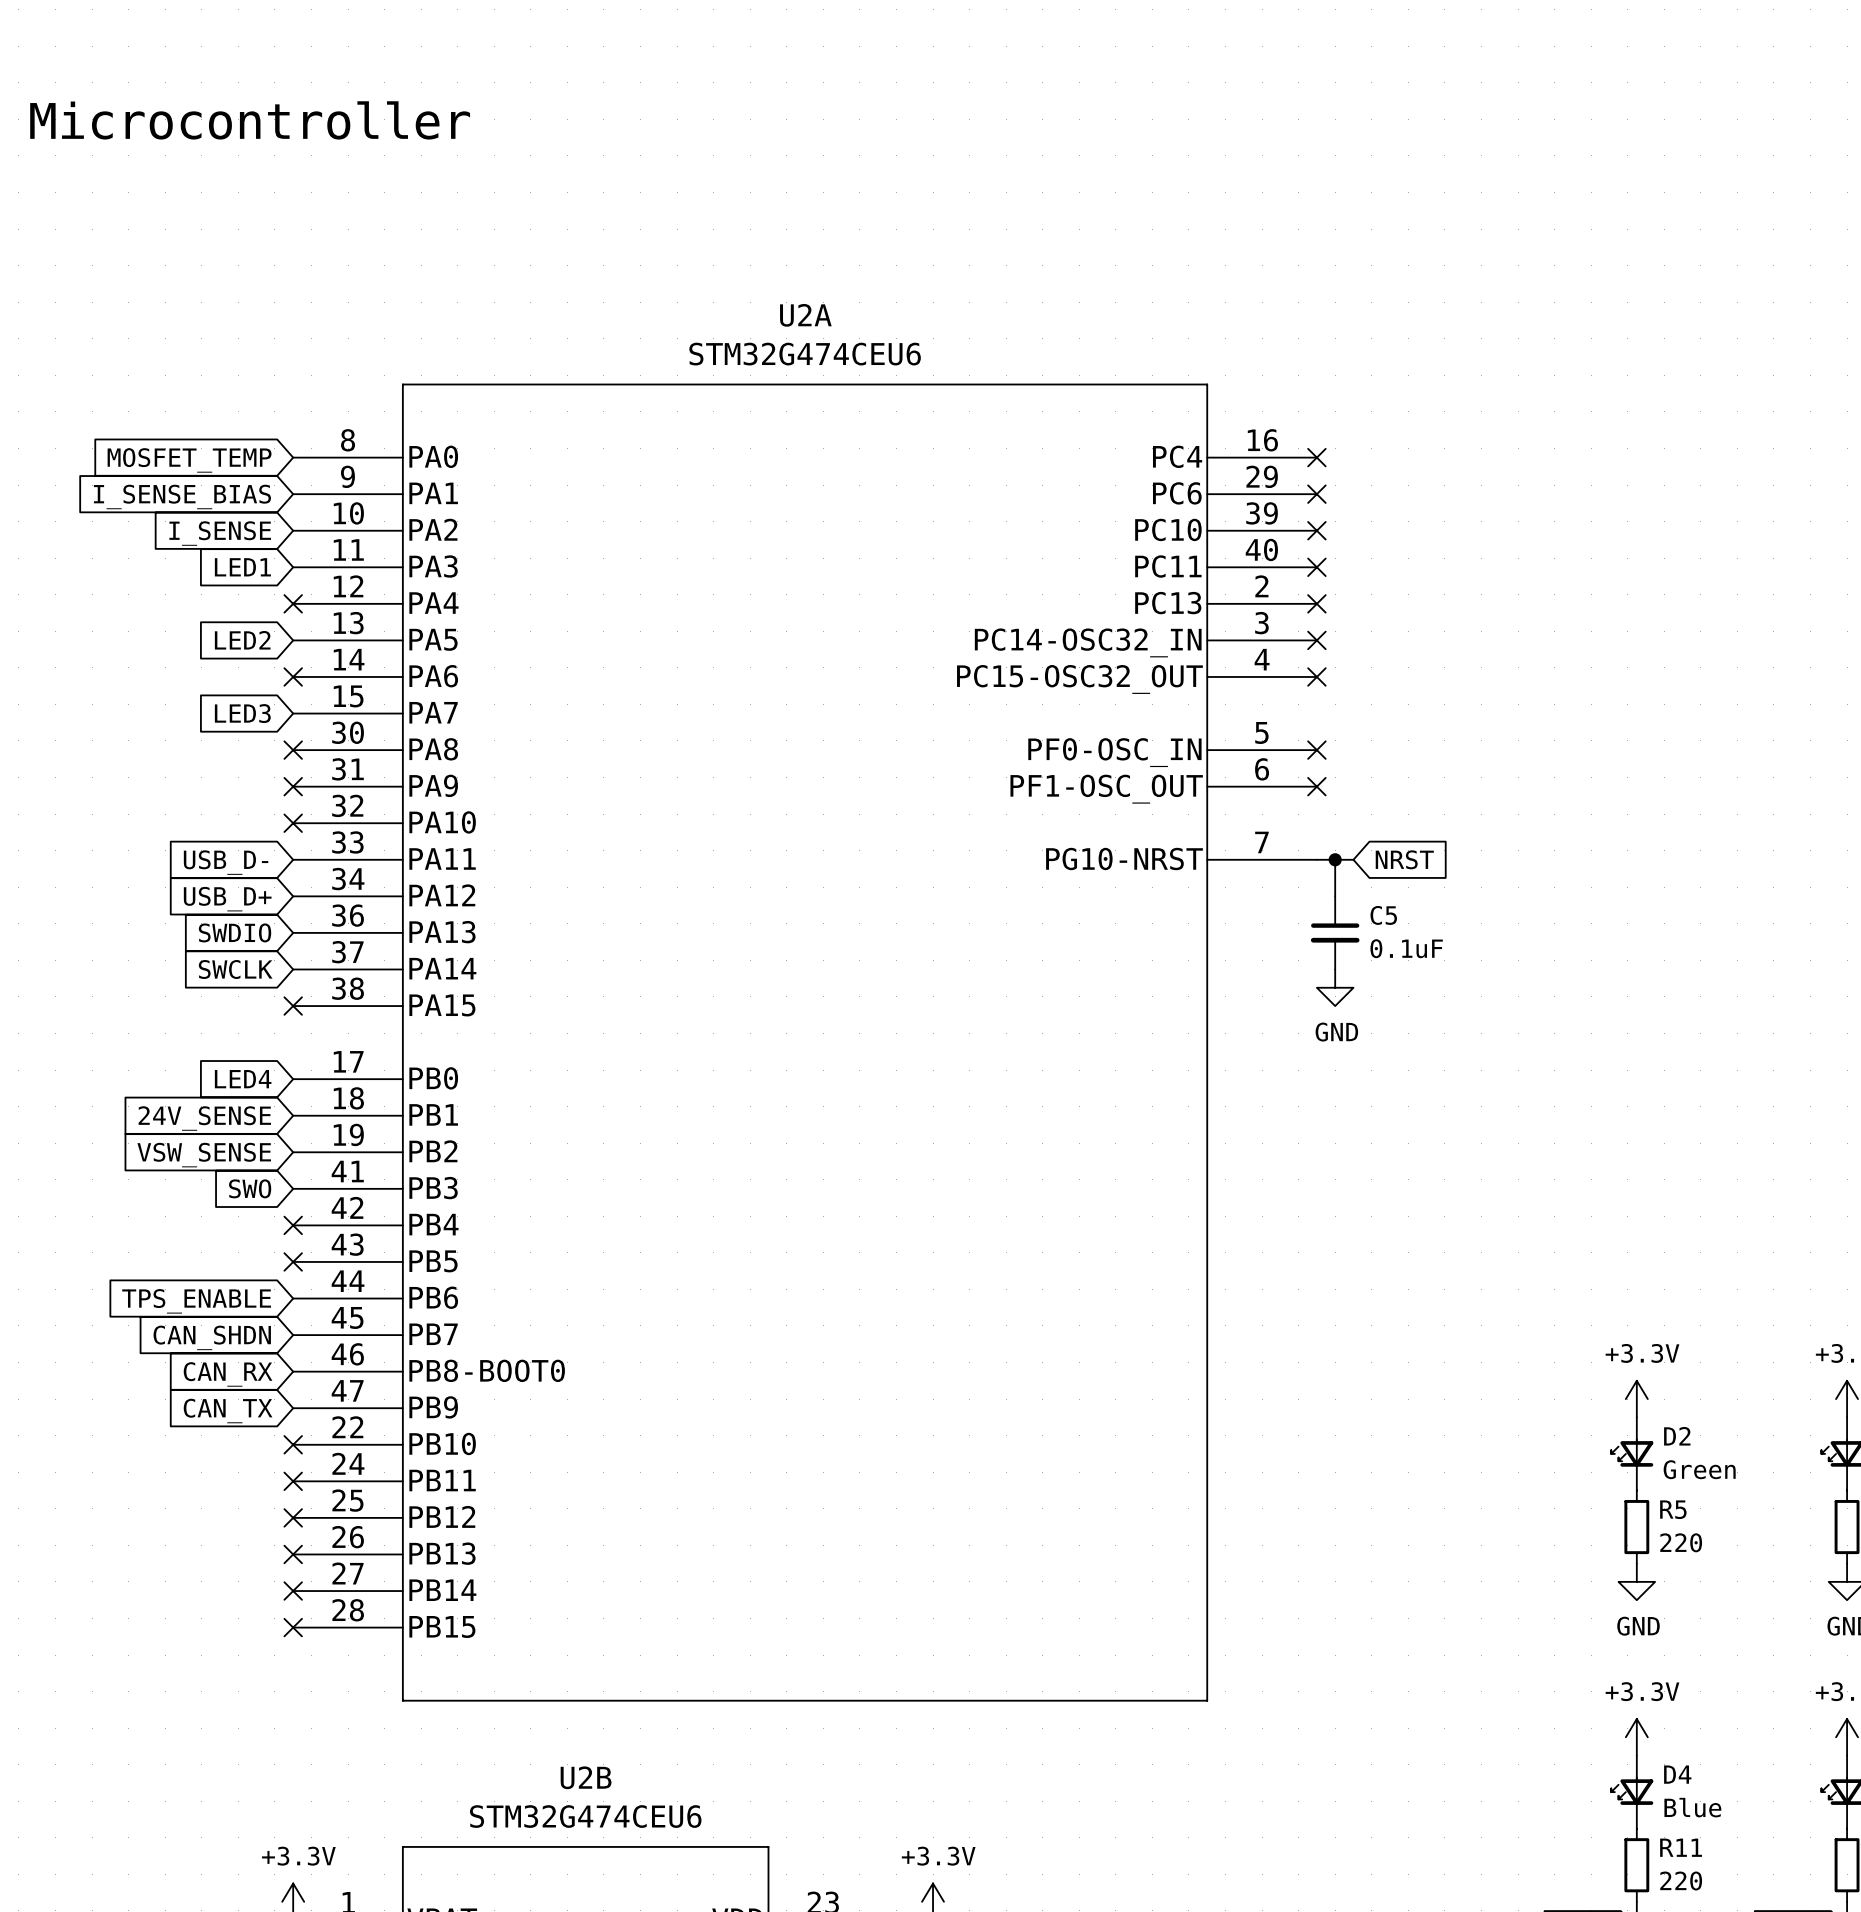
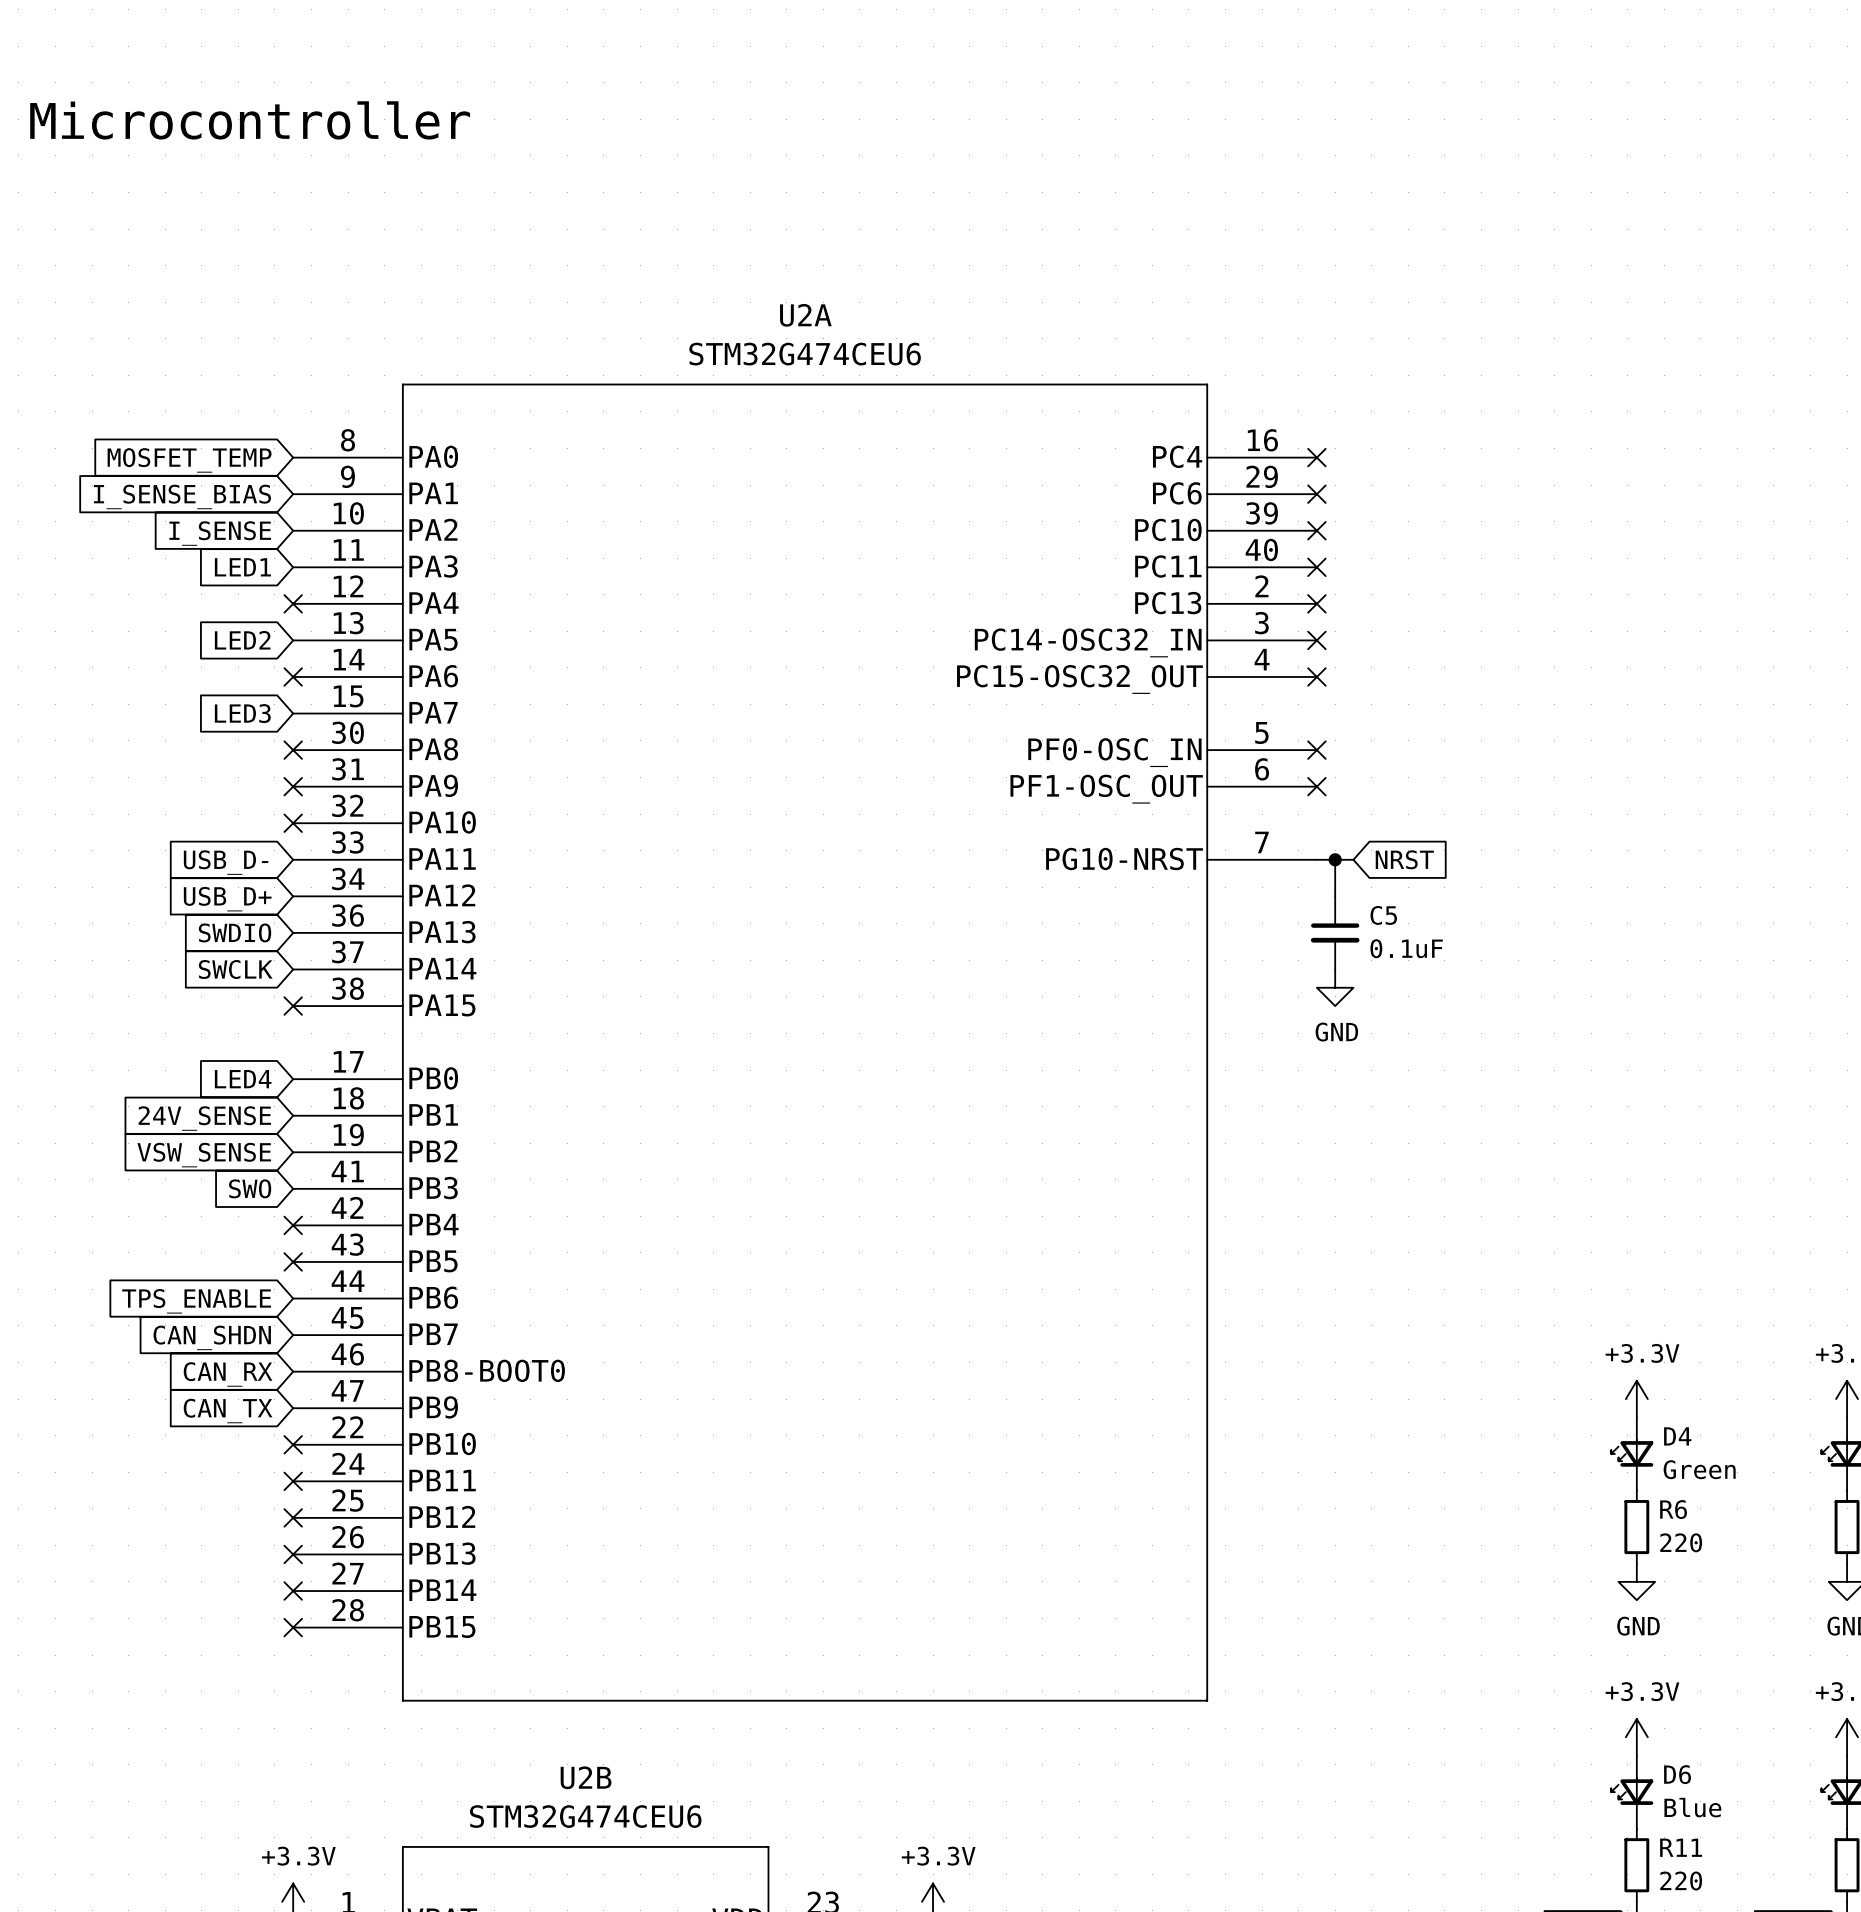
D2 name: D2 (1677, 1436) -> D4 (1677, 1436)
R5 name: R5 (1673, 1509) -> R6 (1673, 1509)
D4 name: D4 (1677, 1774) -> D6 (1677, 1774)

